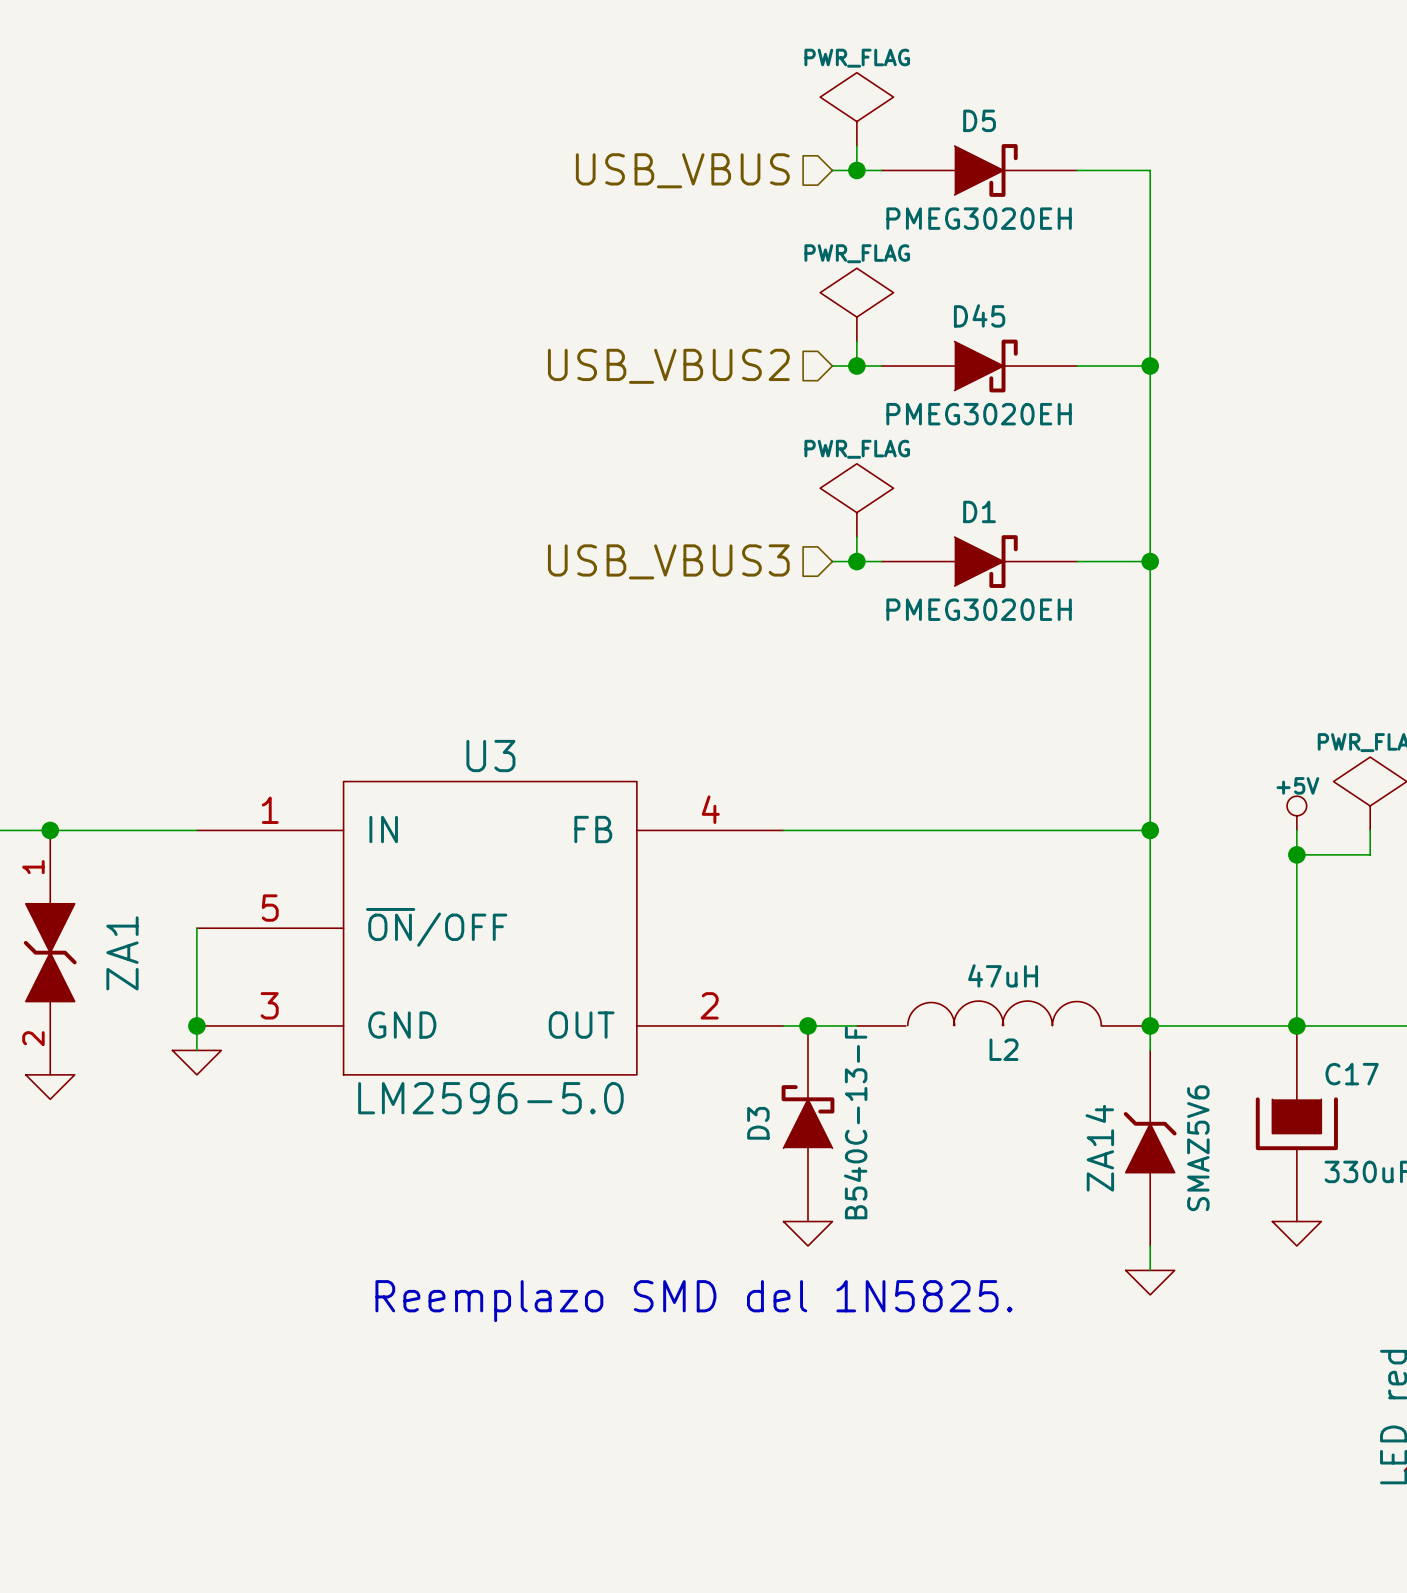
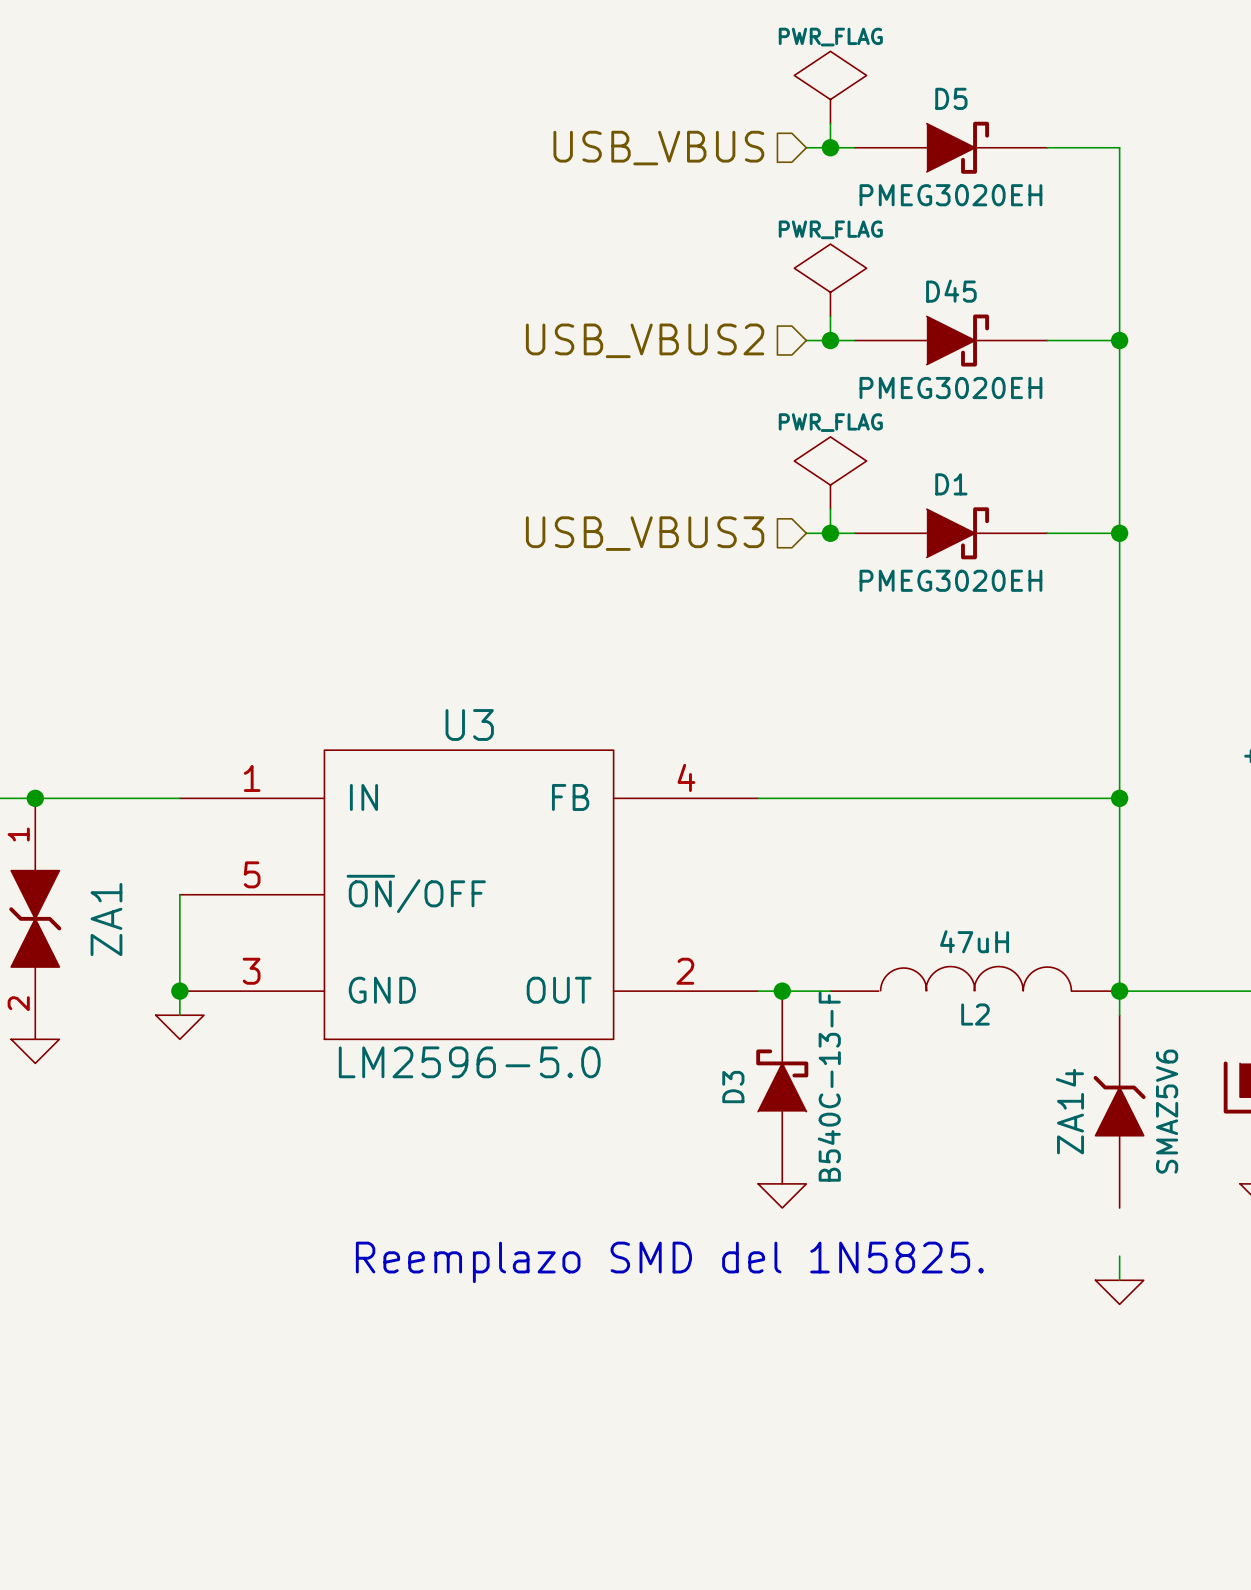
wire: (1150, 1245) (1150, 1270) -> (1119, 1256) (1119, 1280)
power symbol position: (1150, 1282) -> (1119, 1292)

